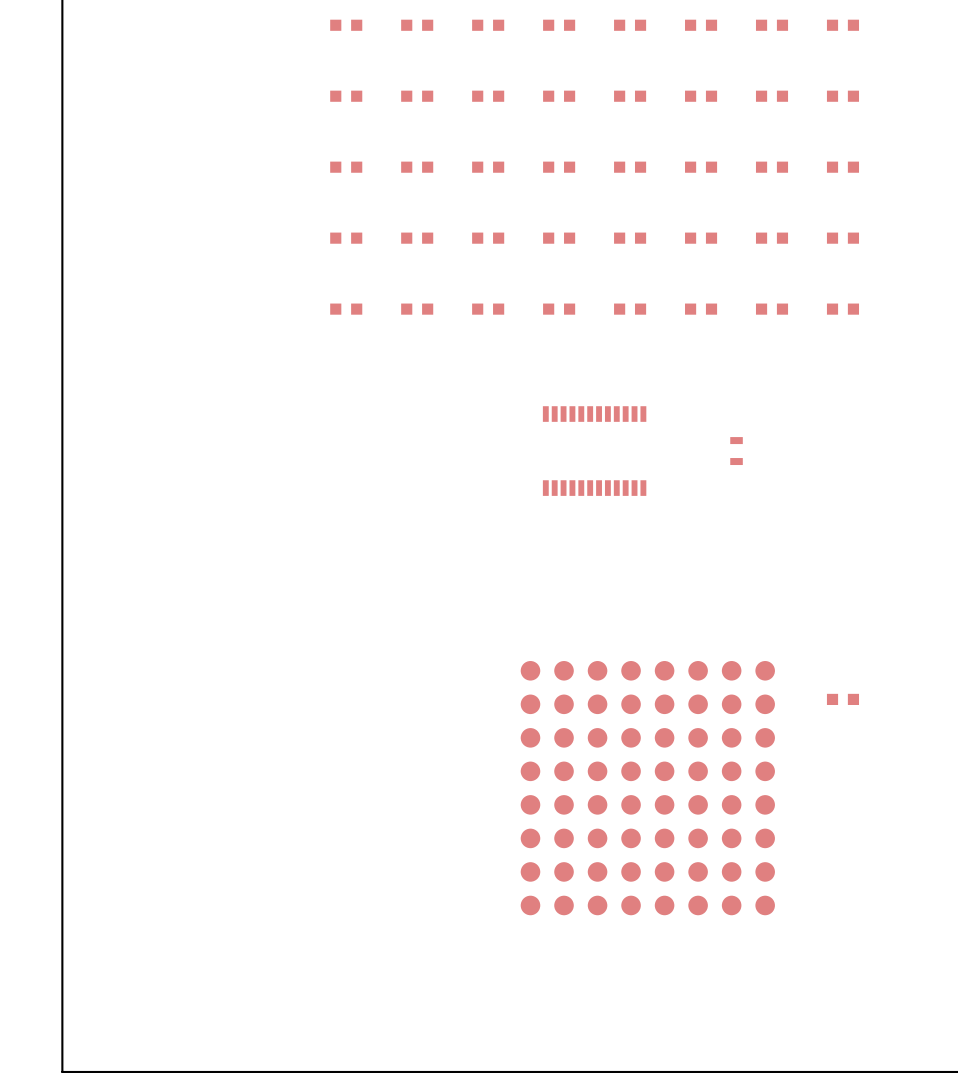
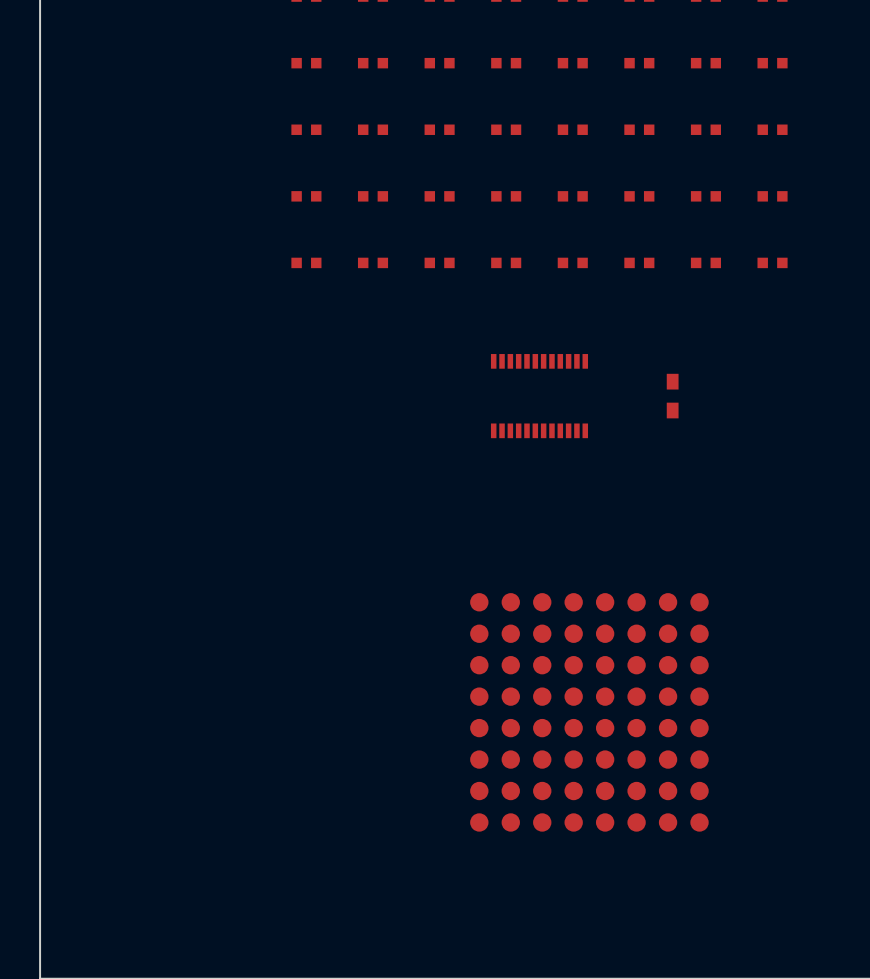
part footprint: [730, 437, 743, 466] -> [666, 373, 679, 419]
part: (842, 699) -> none

